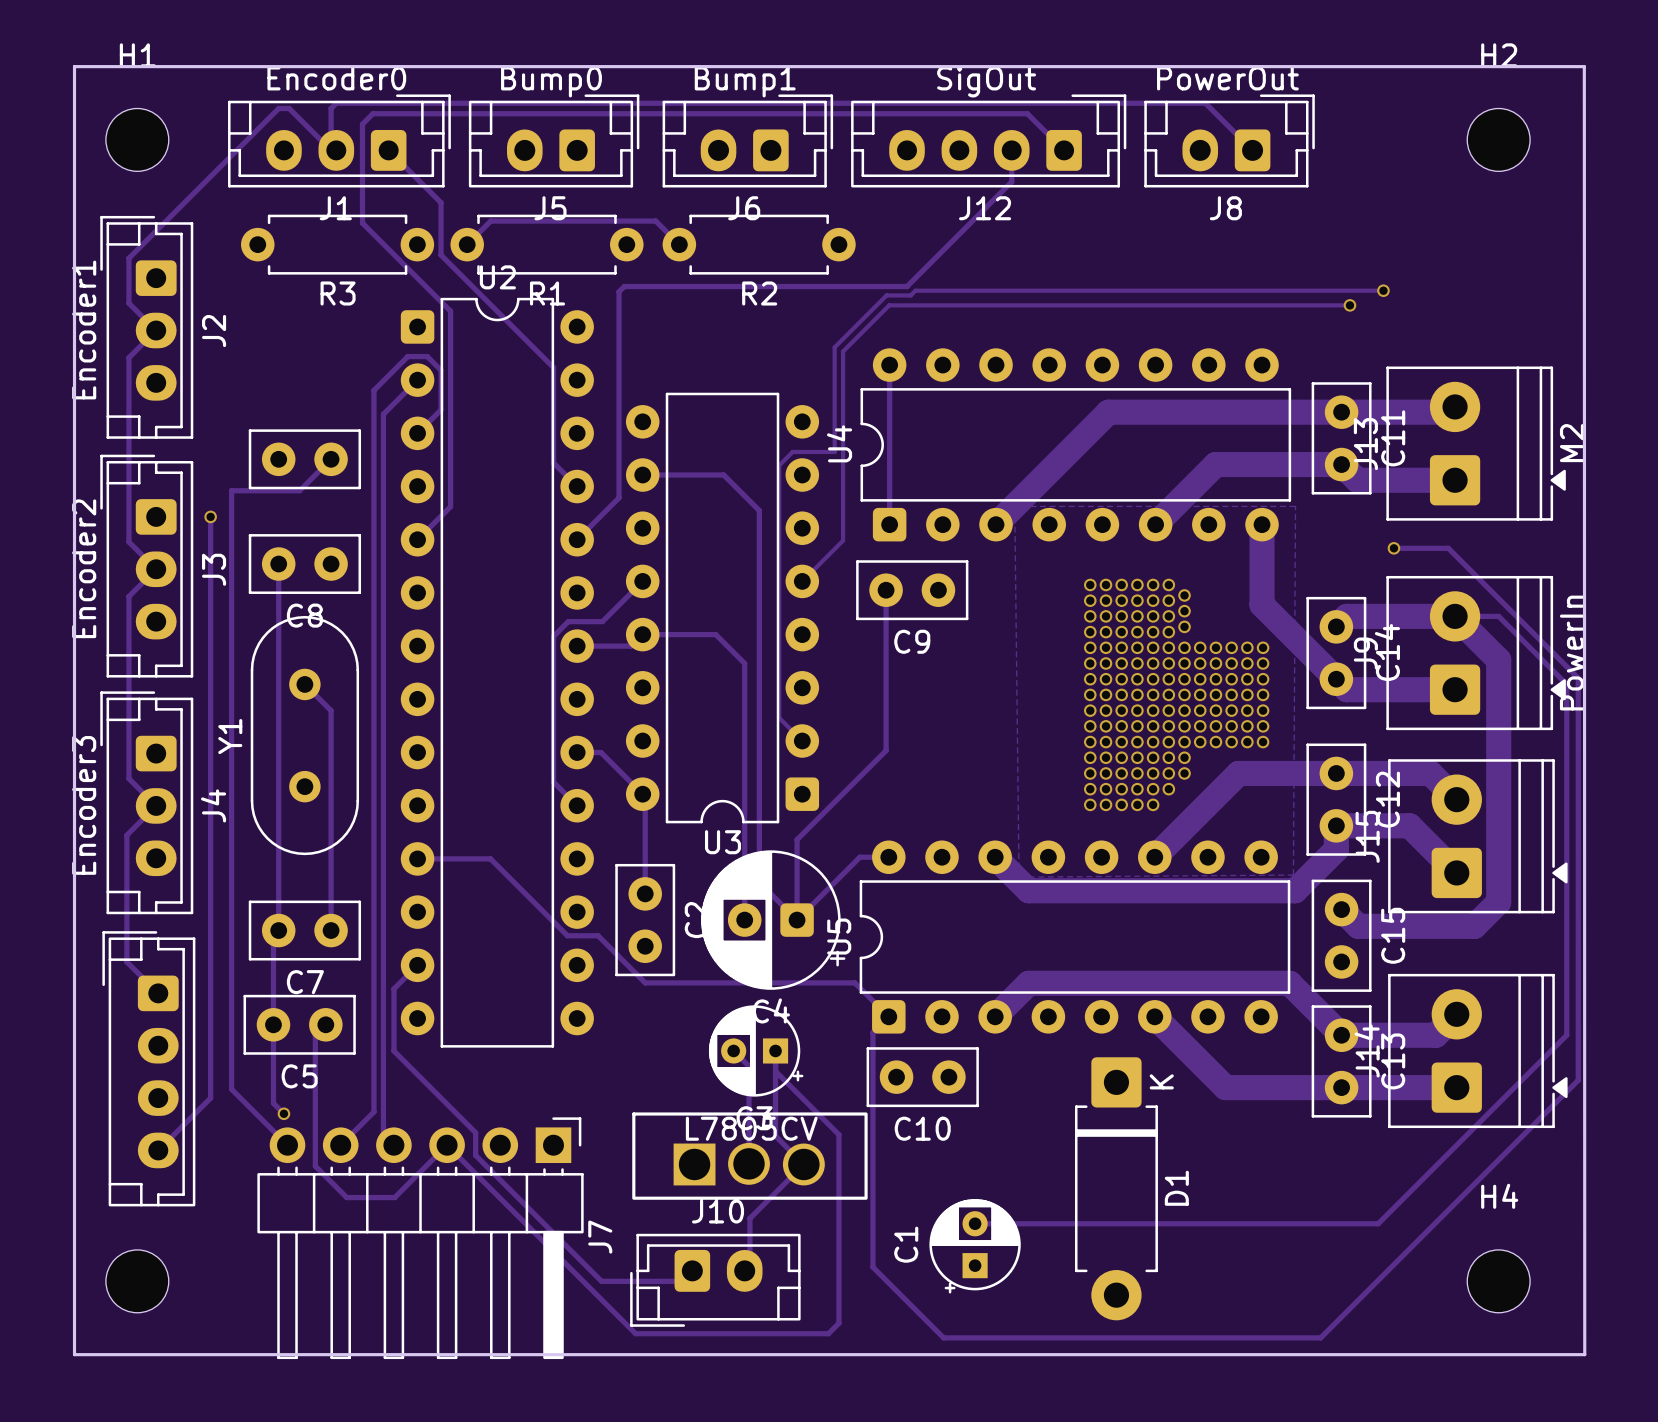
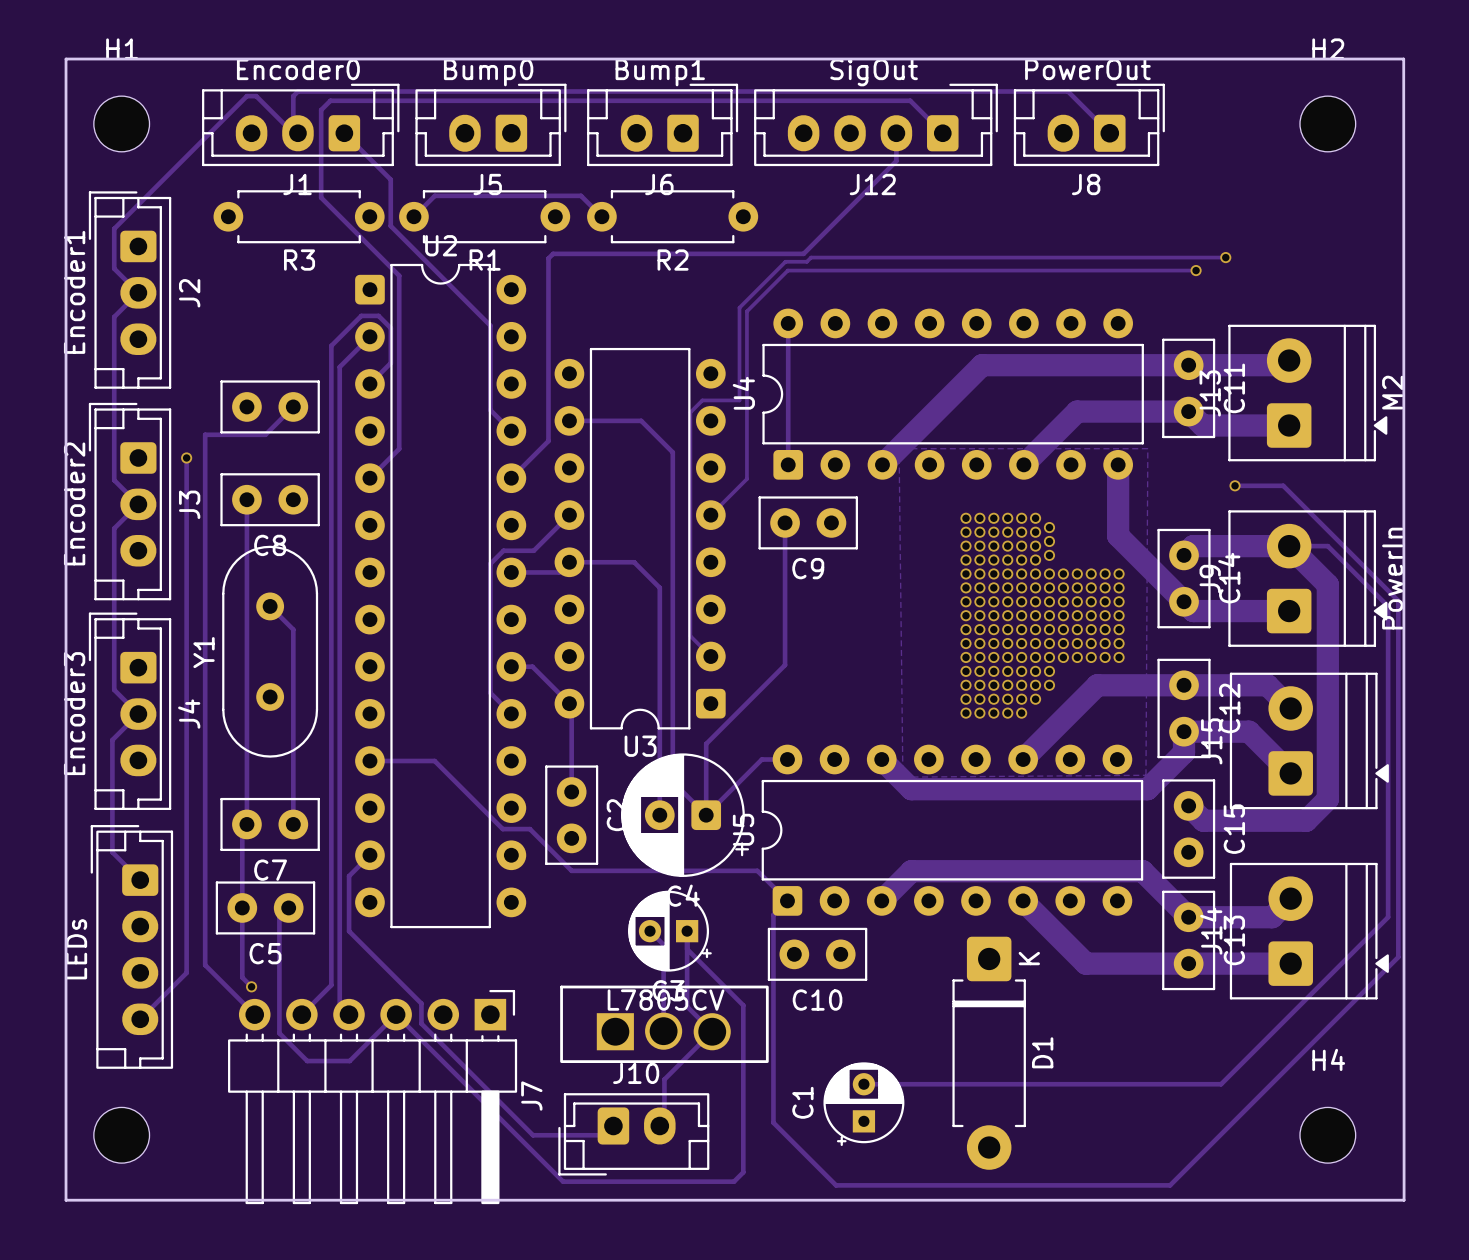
part value: none -> LEDs (76, 949)

